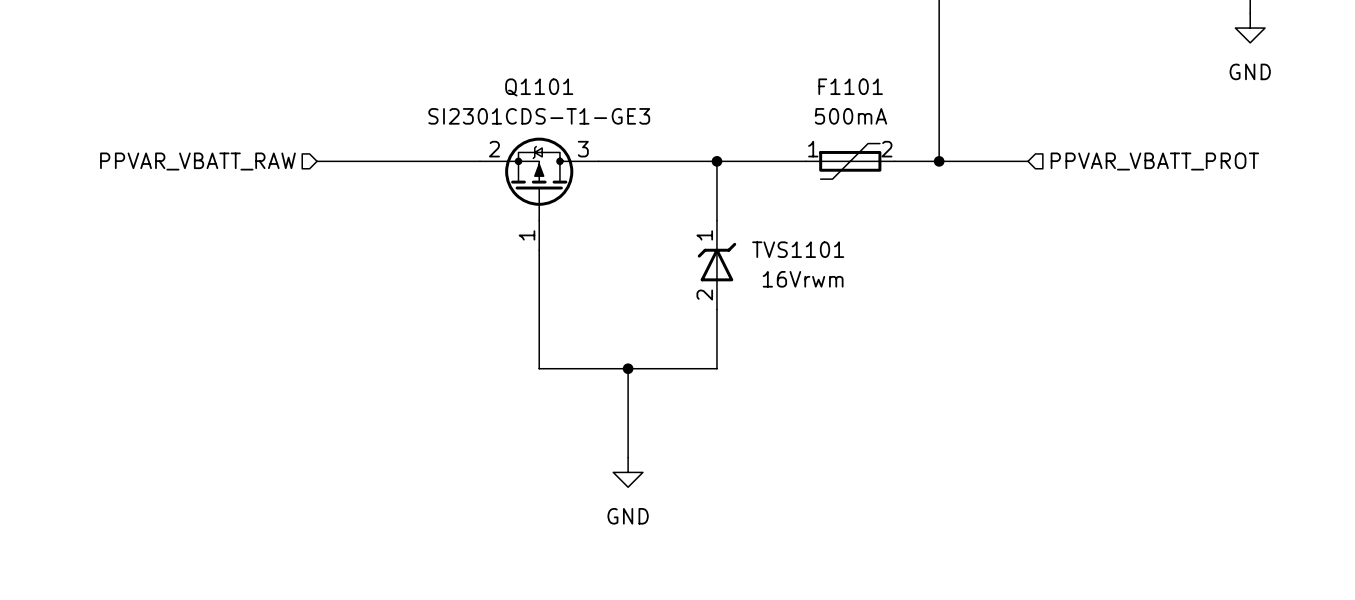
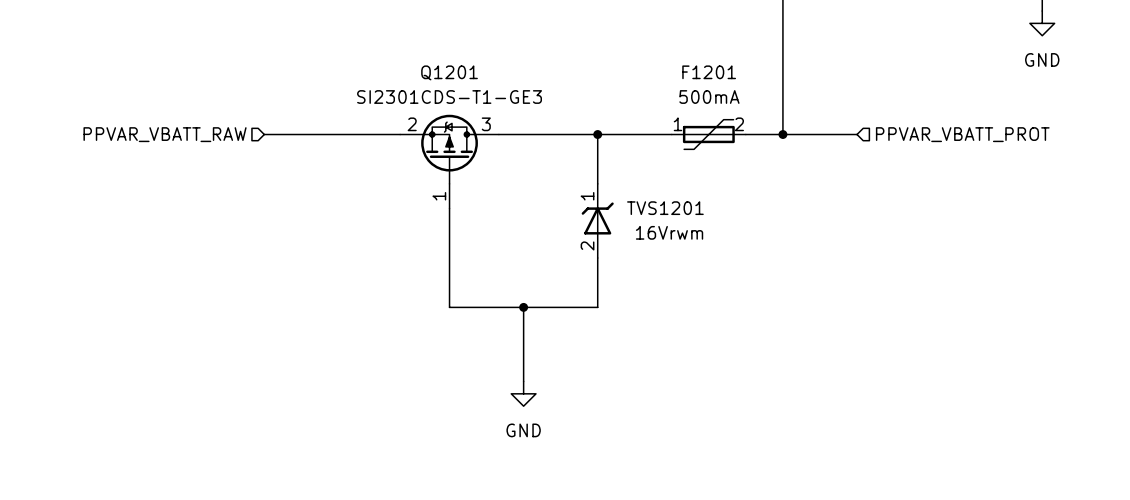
F1101 name: F1101 (850, 86) -> F1201 (709, 72)
Q1101 name: Q1101 (539, 87) -> Q1201 (449, 72)
TVS1101 name: TVS1101 (798, 249) -> TVS1201 (665, 208)

